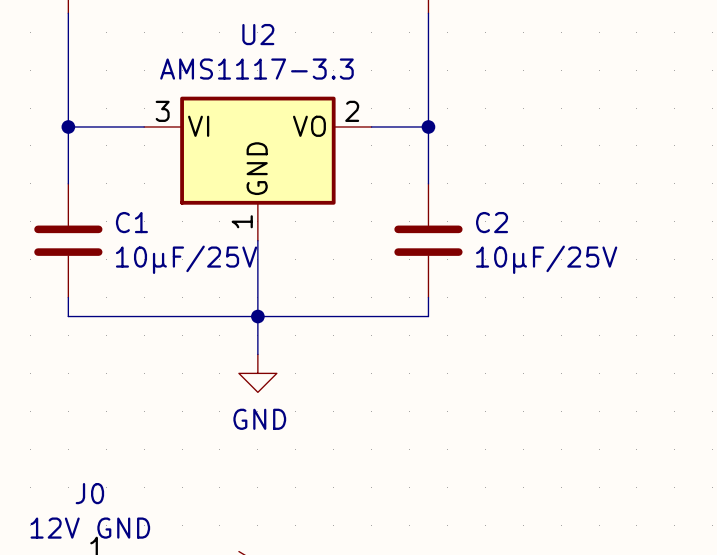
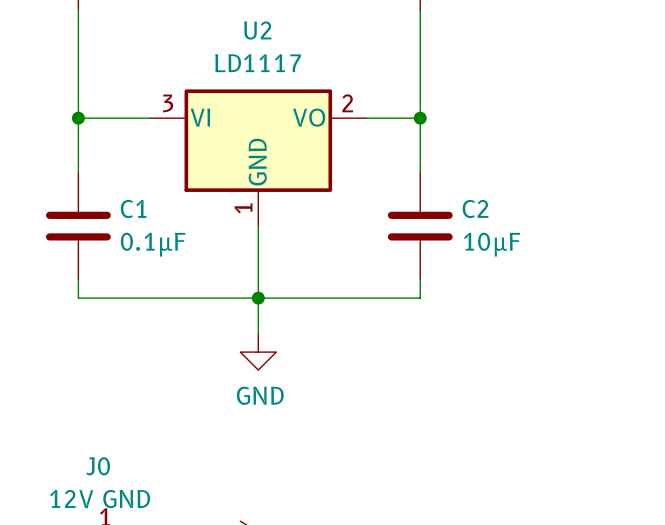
U2 value: AMS1117-3.3 (256, 69) -> LD1117 (258, 63)
C1 value: 10µF/25V (186, 259) -> 0.1µF (153, 244)
C2 value: 10µF/25V (546, 259) -> 10µF (492, 244)

